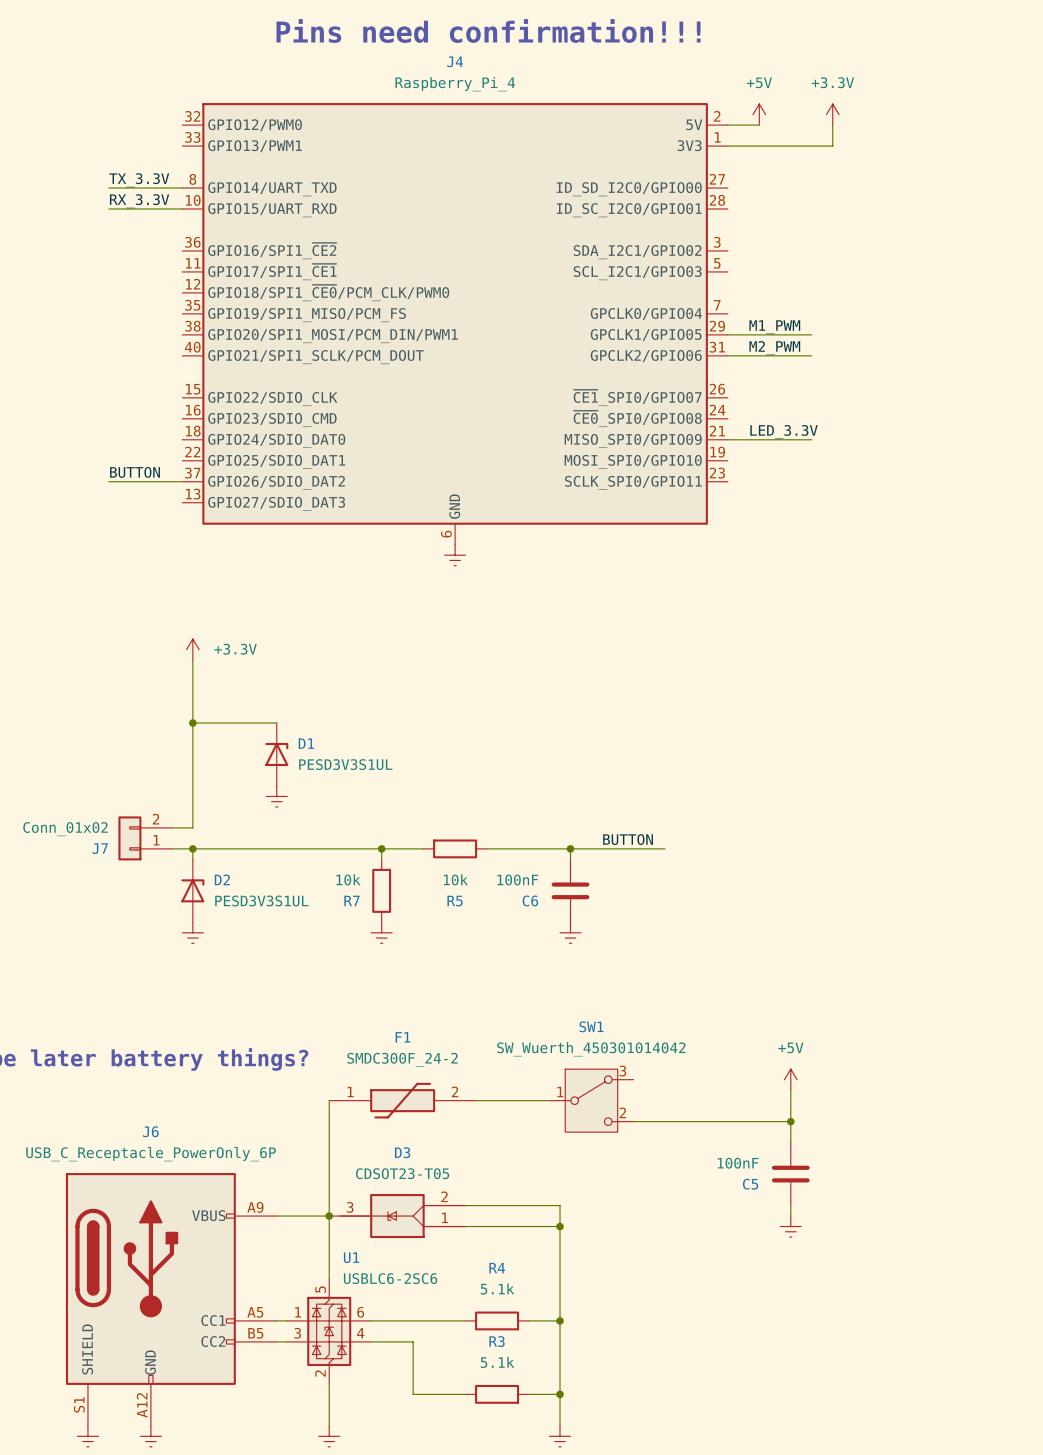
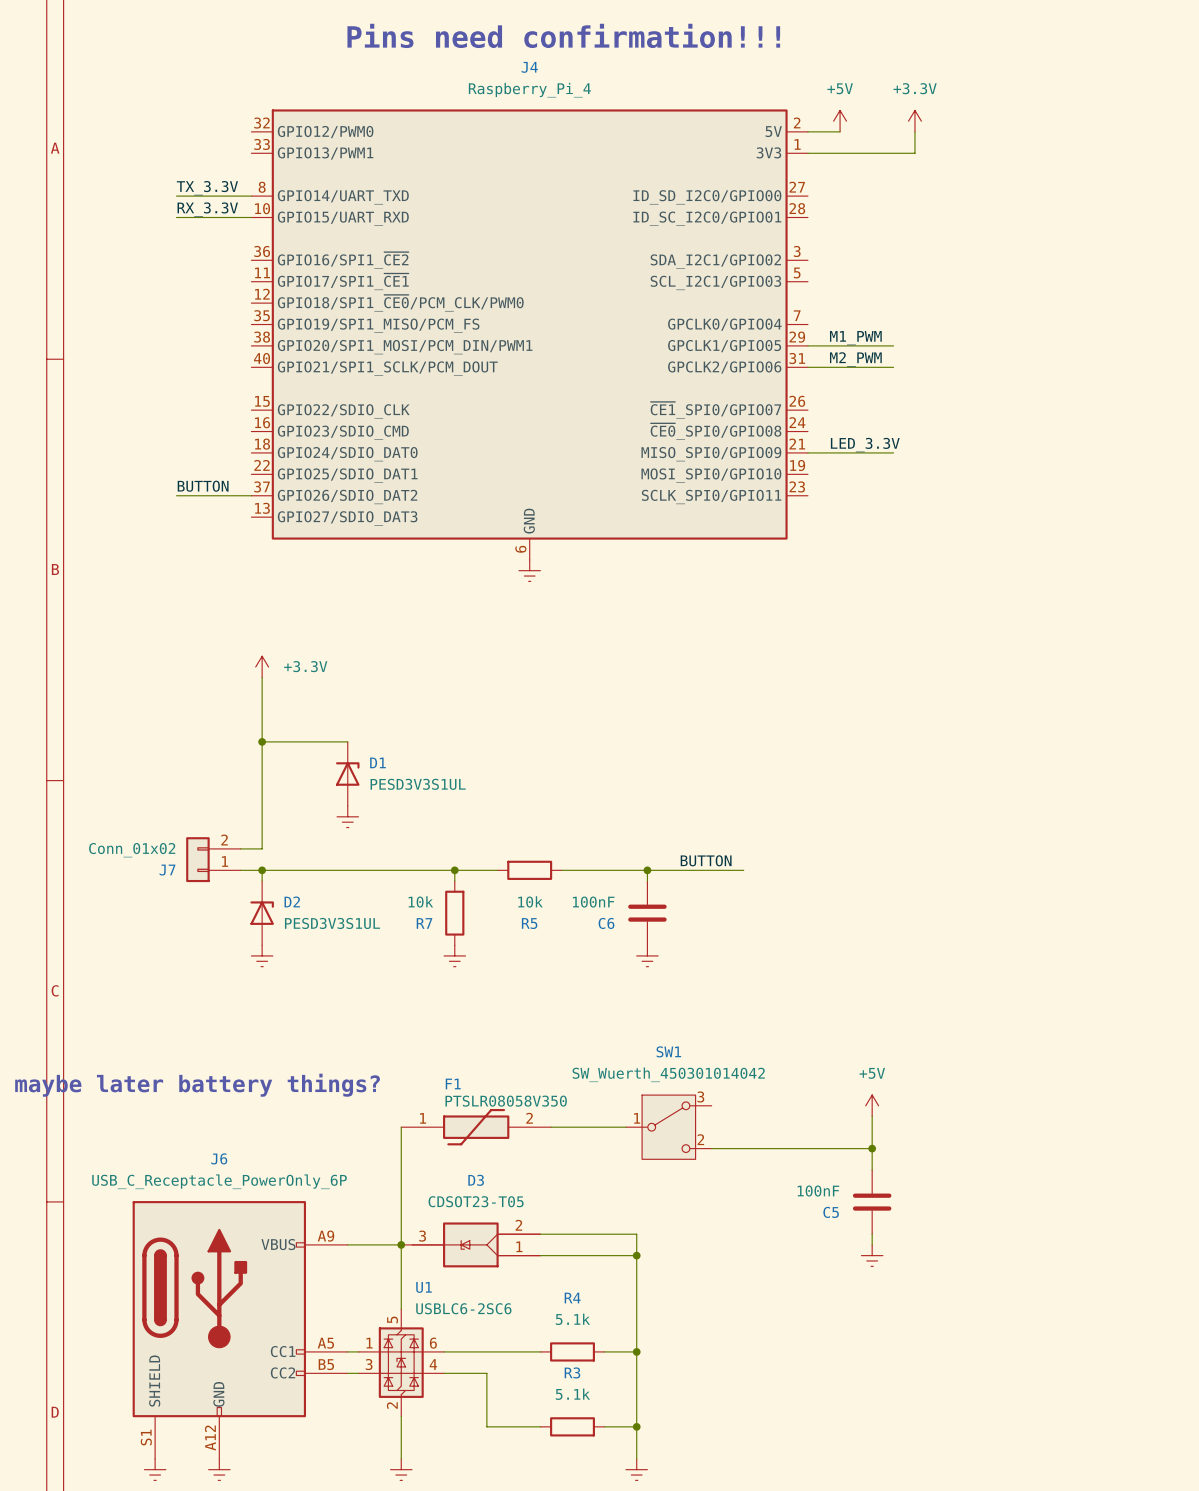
F1 name position: F1 (402, 1037) -> F1 (453, 1083)
F1 value: SMDC300F_24-2 (402, 1059) -> PTSLR08058V350 (506, 1101)

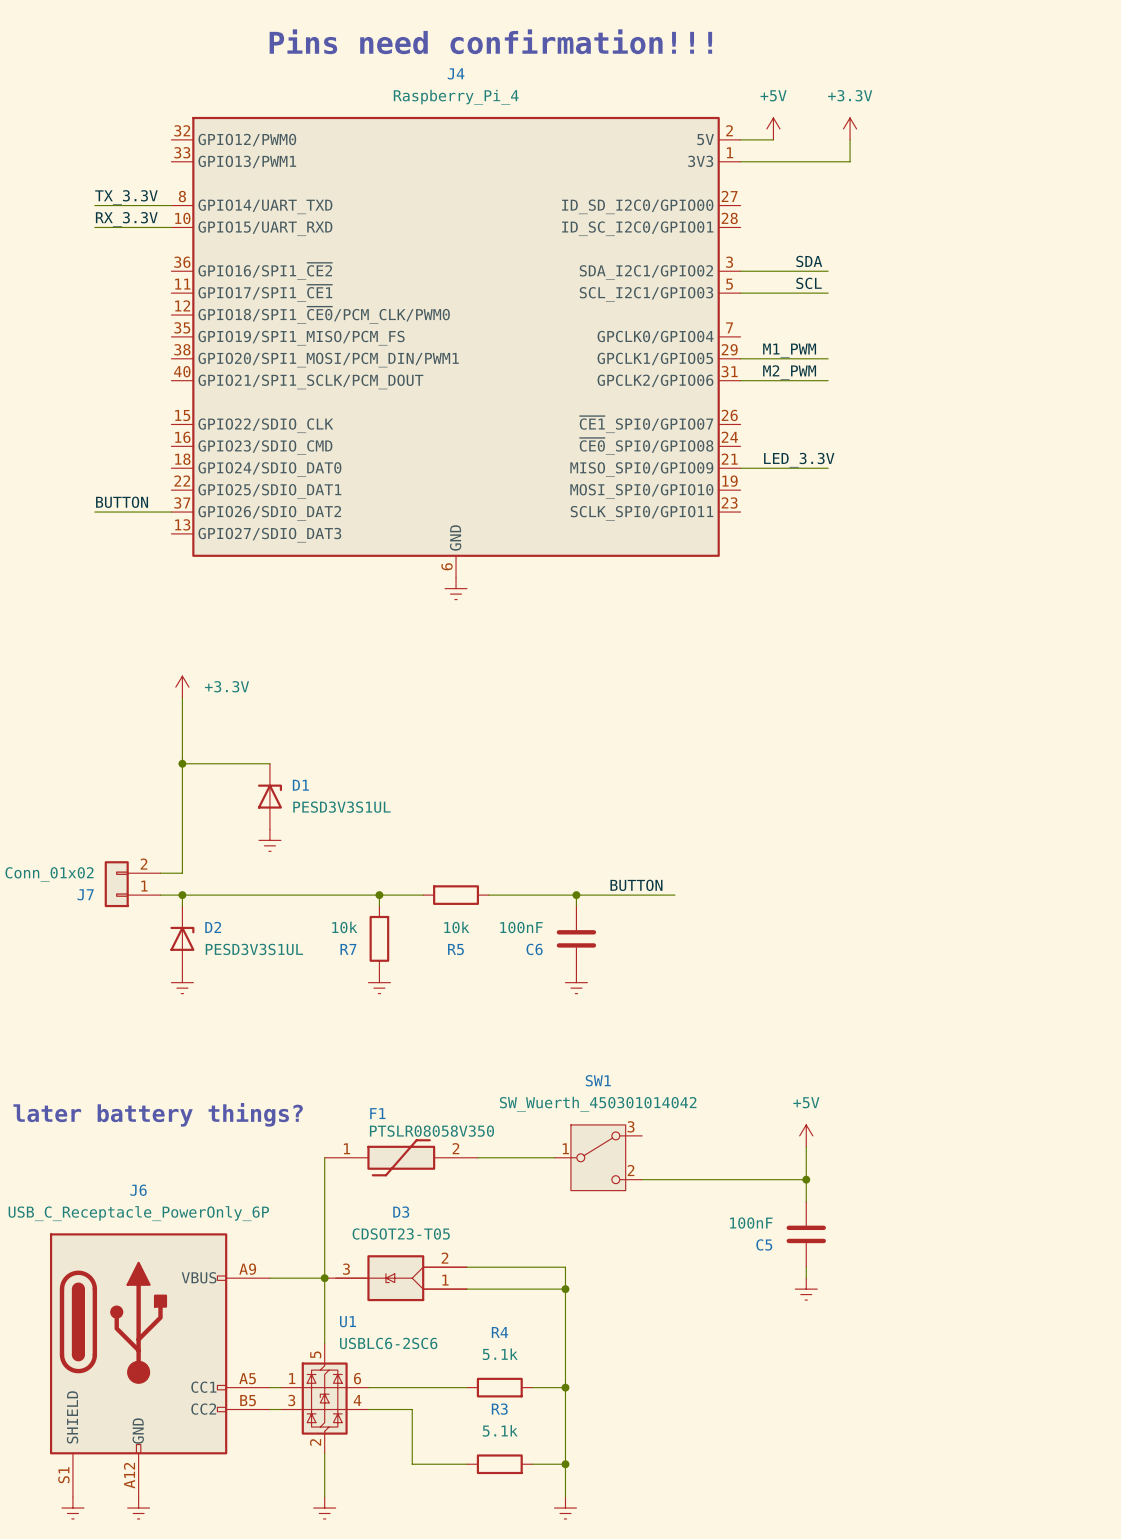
label: none -> SDA (809, 261)
wire: none -> (740, 271) (828, 271)
label: none -> SCL (809, 283)
wire: none -> (740, 293) (828, 293)

